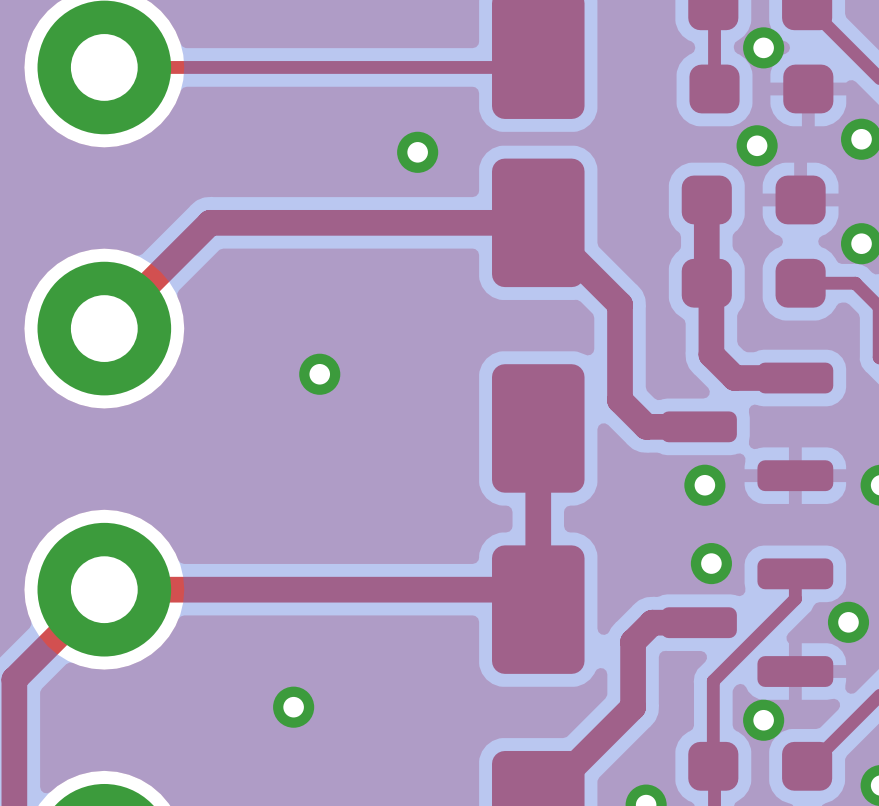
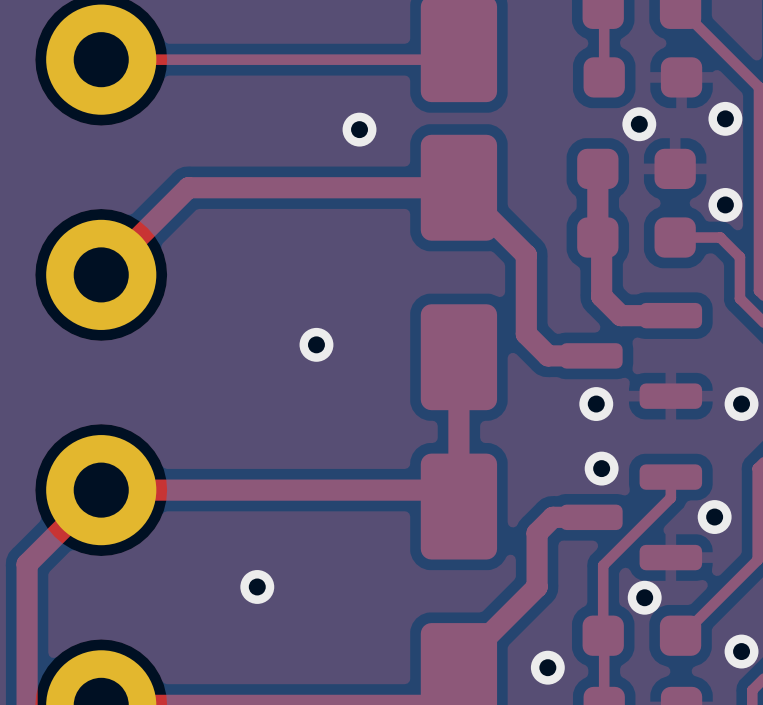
via: (763, 47) -> none
via position: (319, 374) -> (316, 344)

